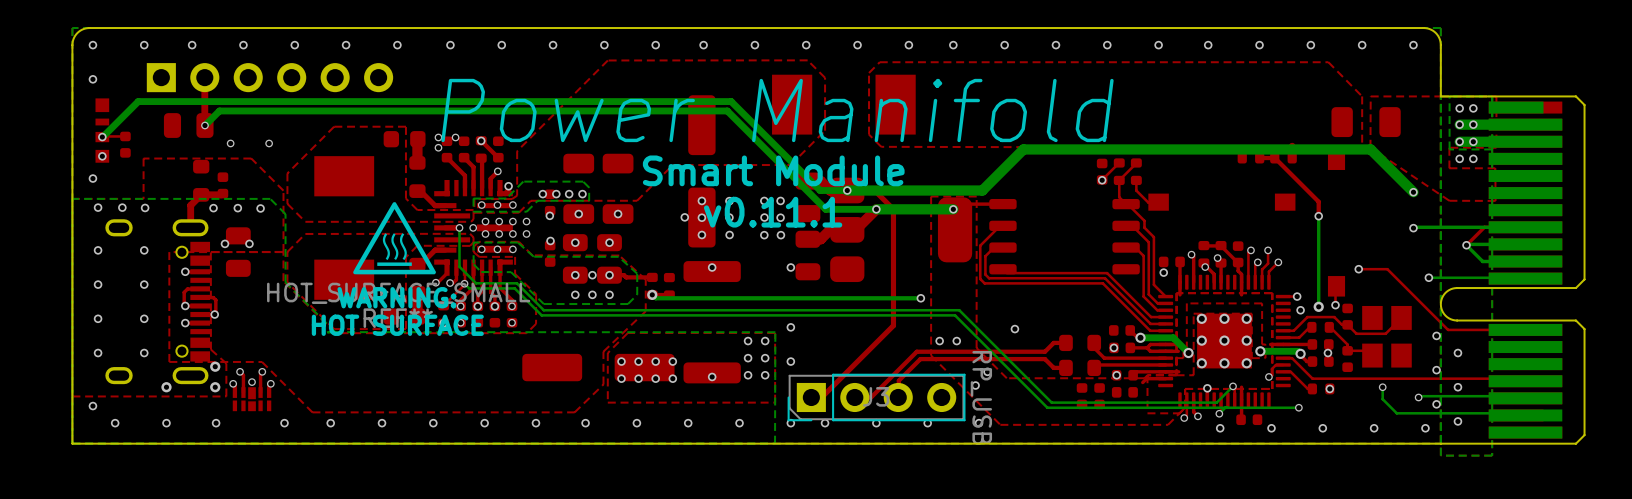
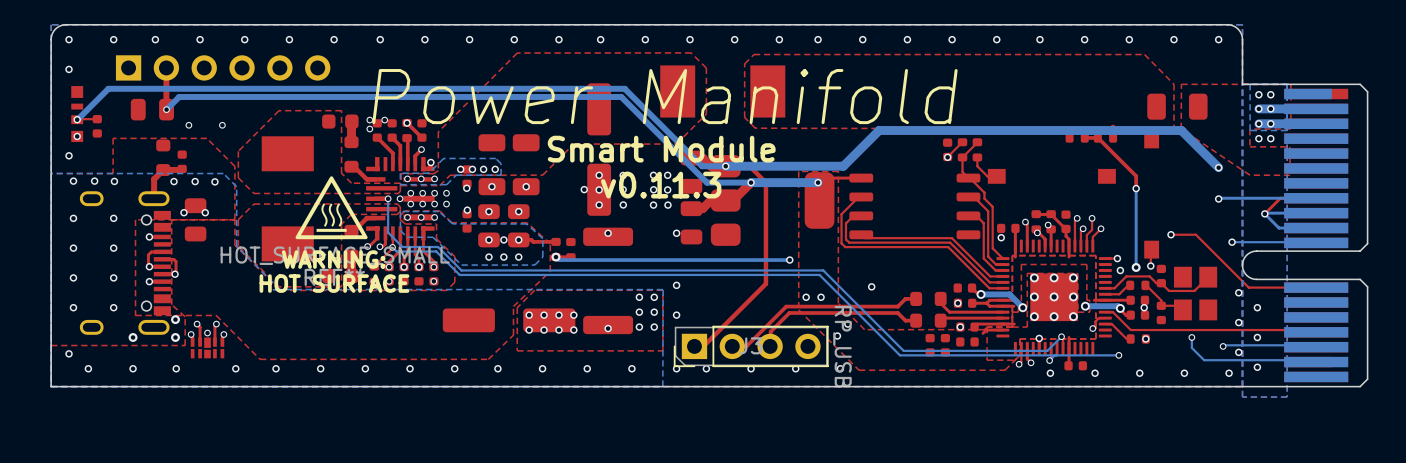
text: v0.11.1 (773, 212) -> v0.11.3 (661, 185)

